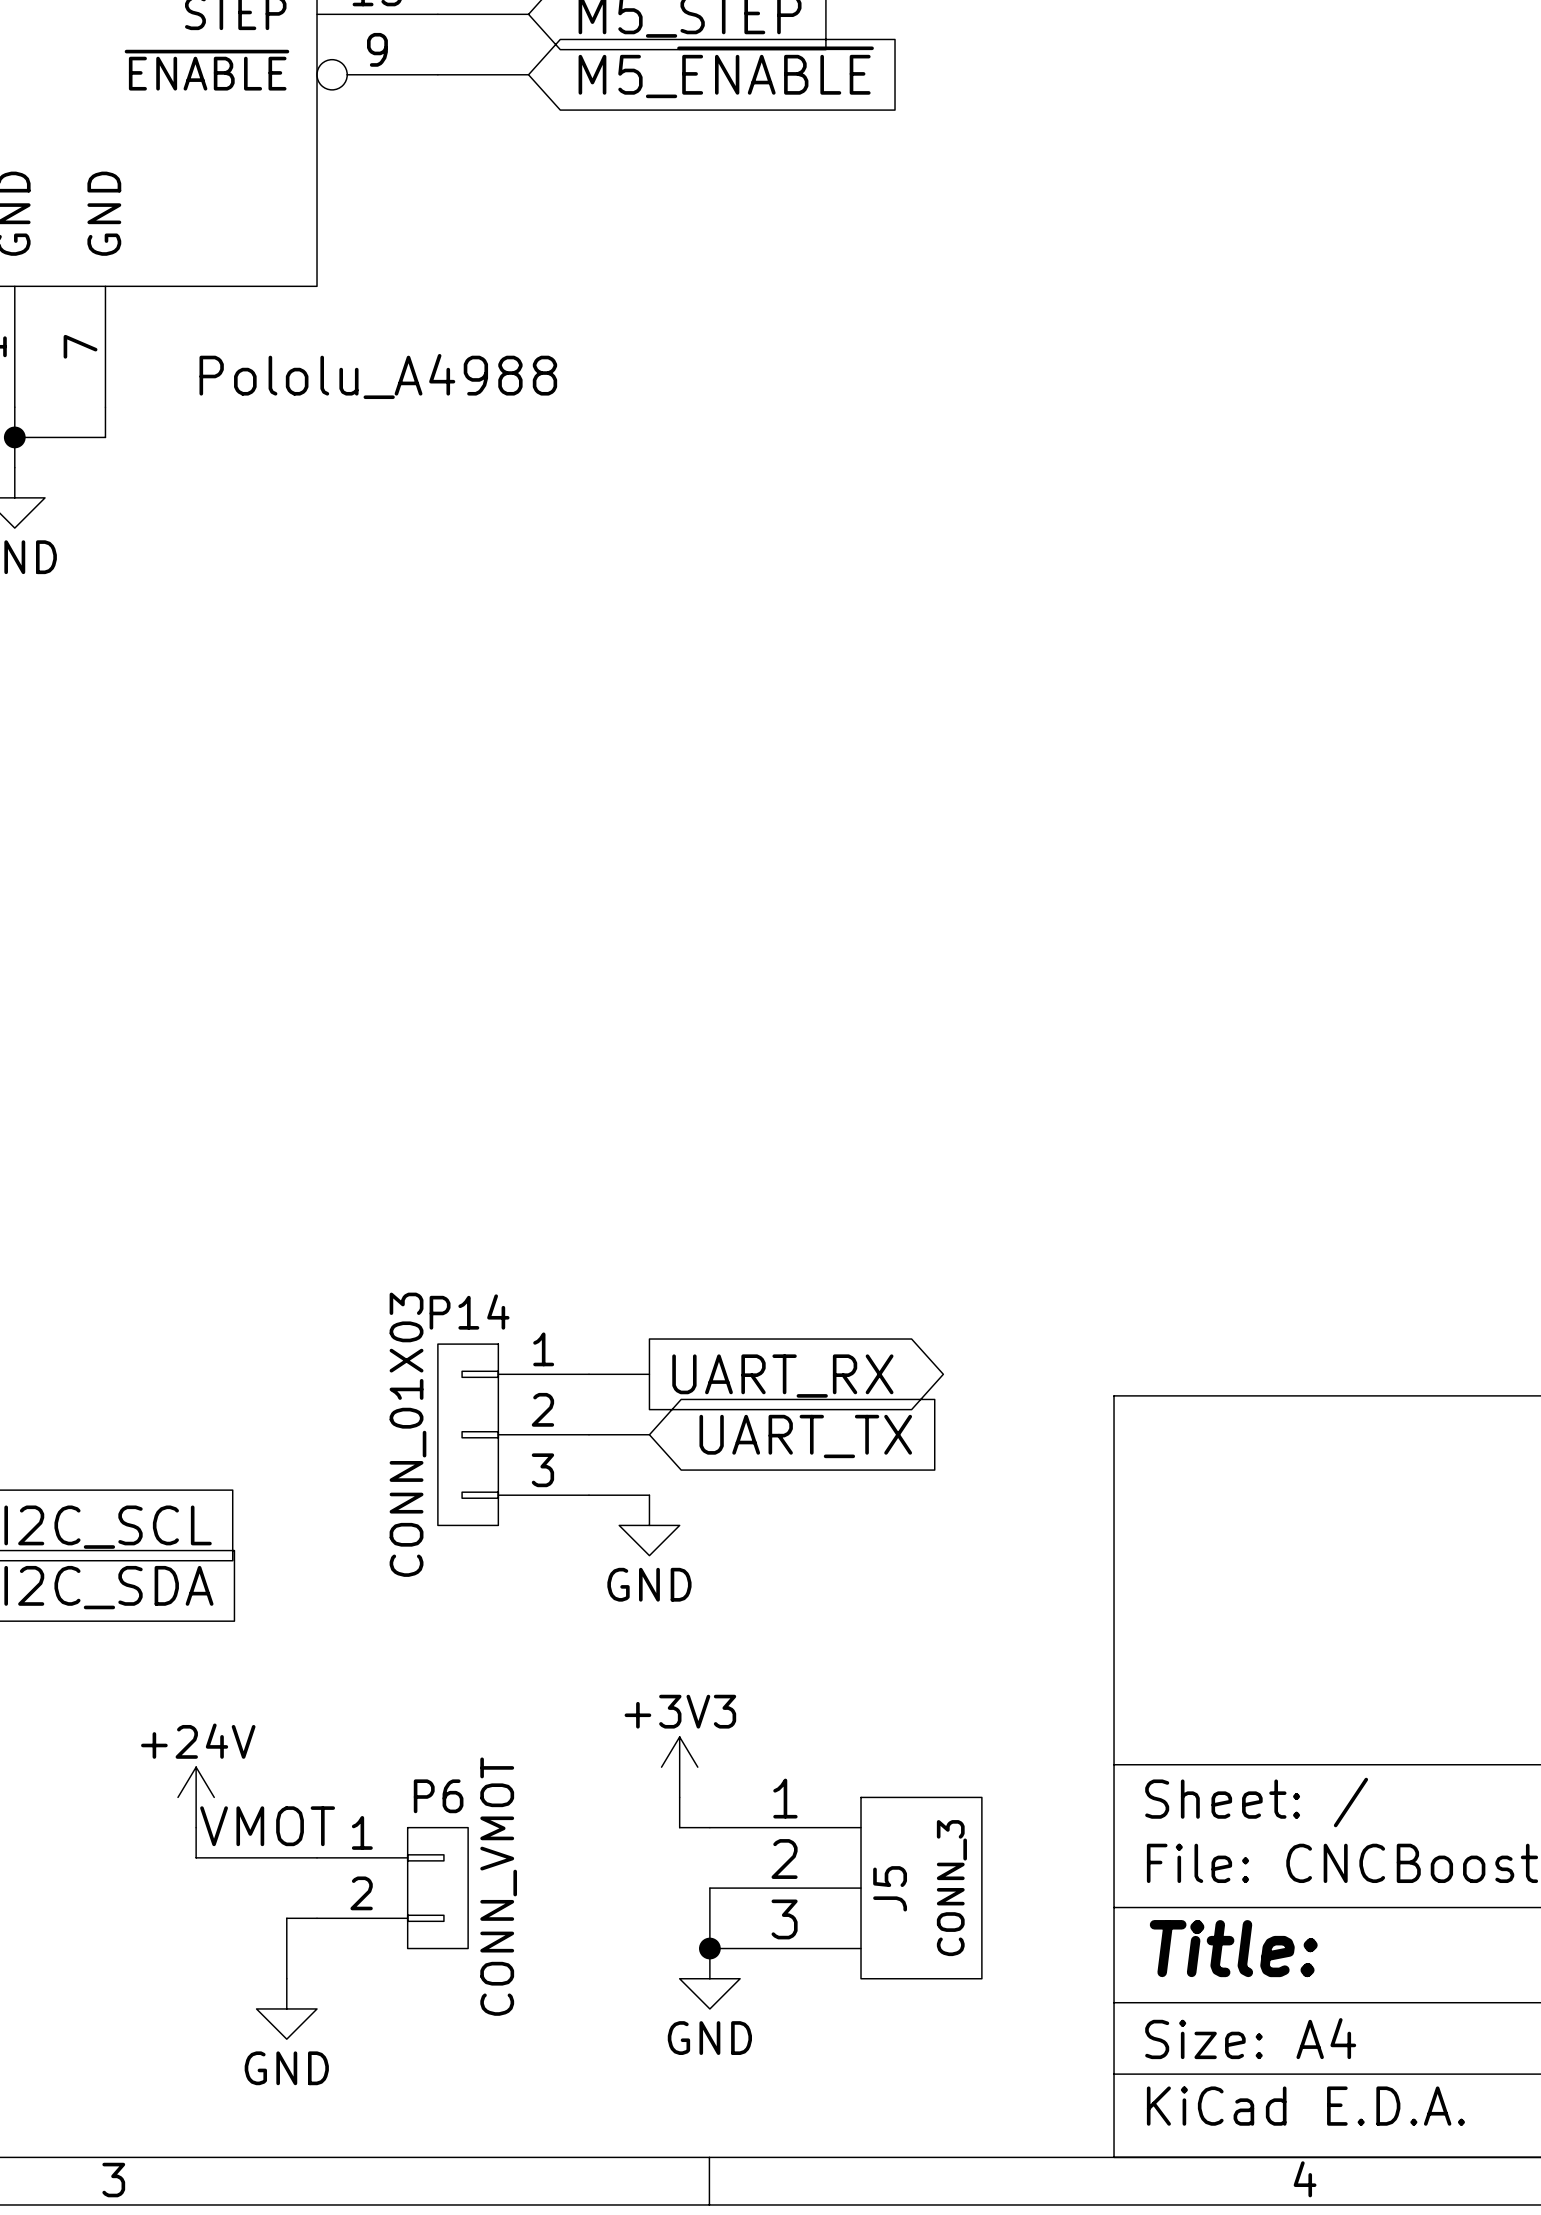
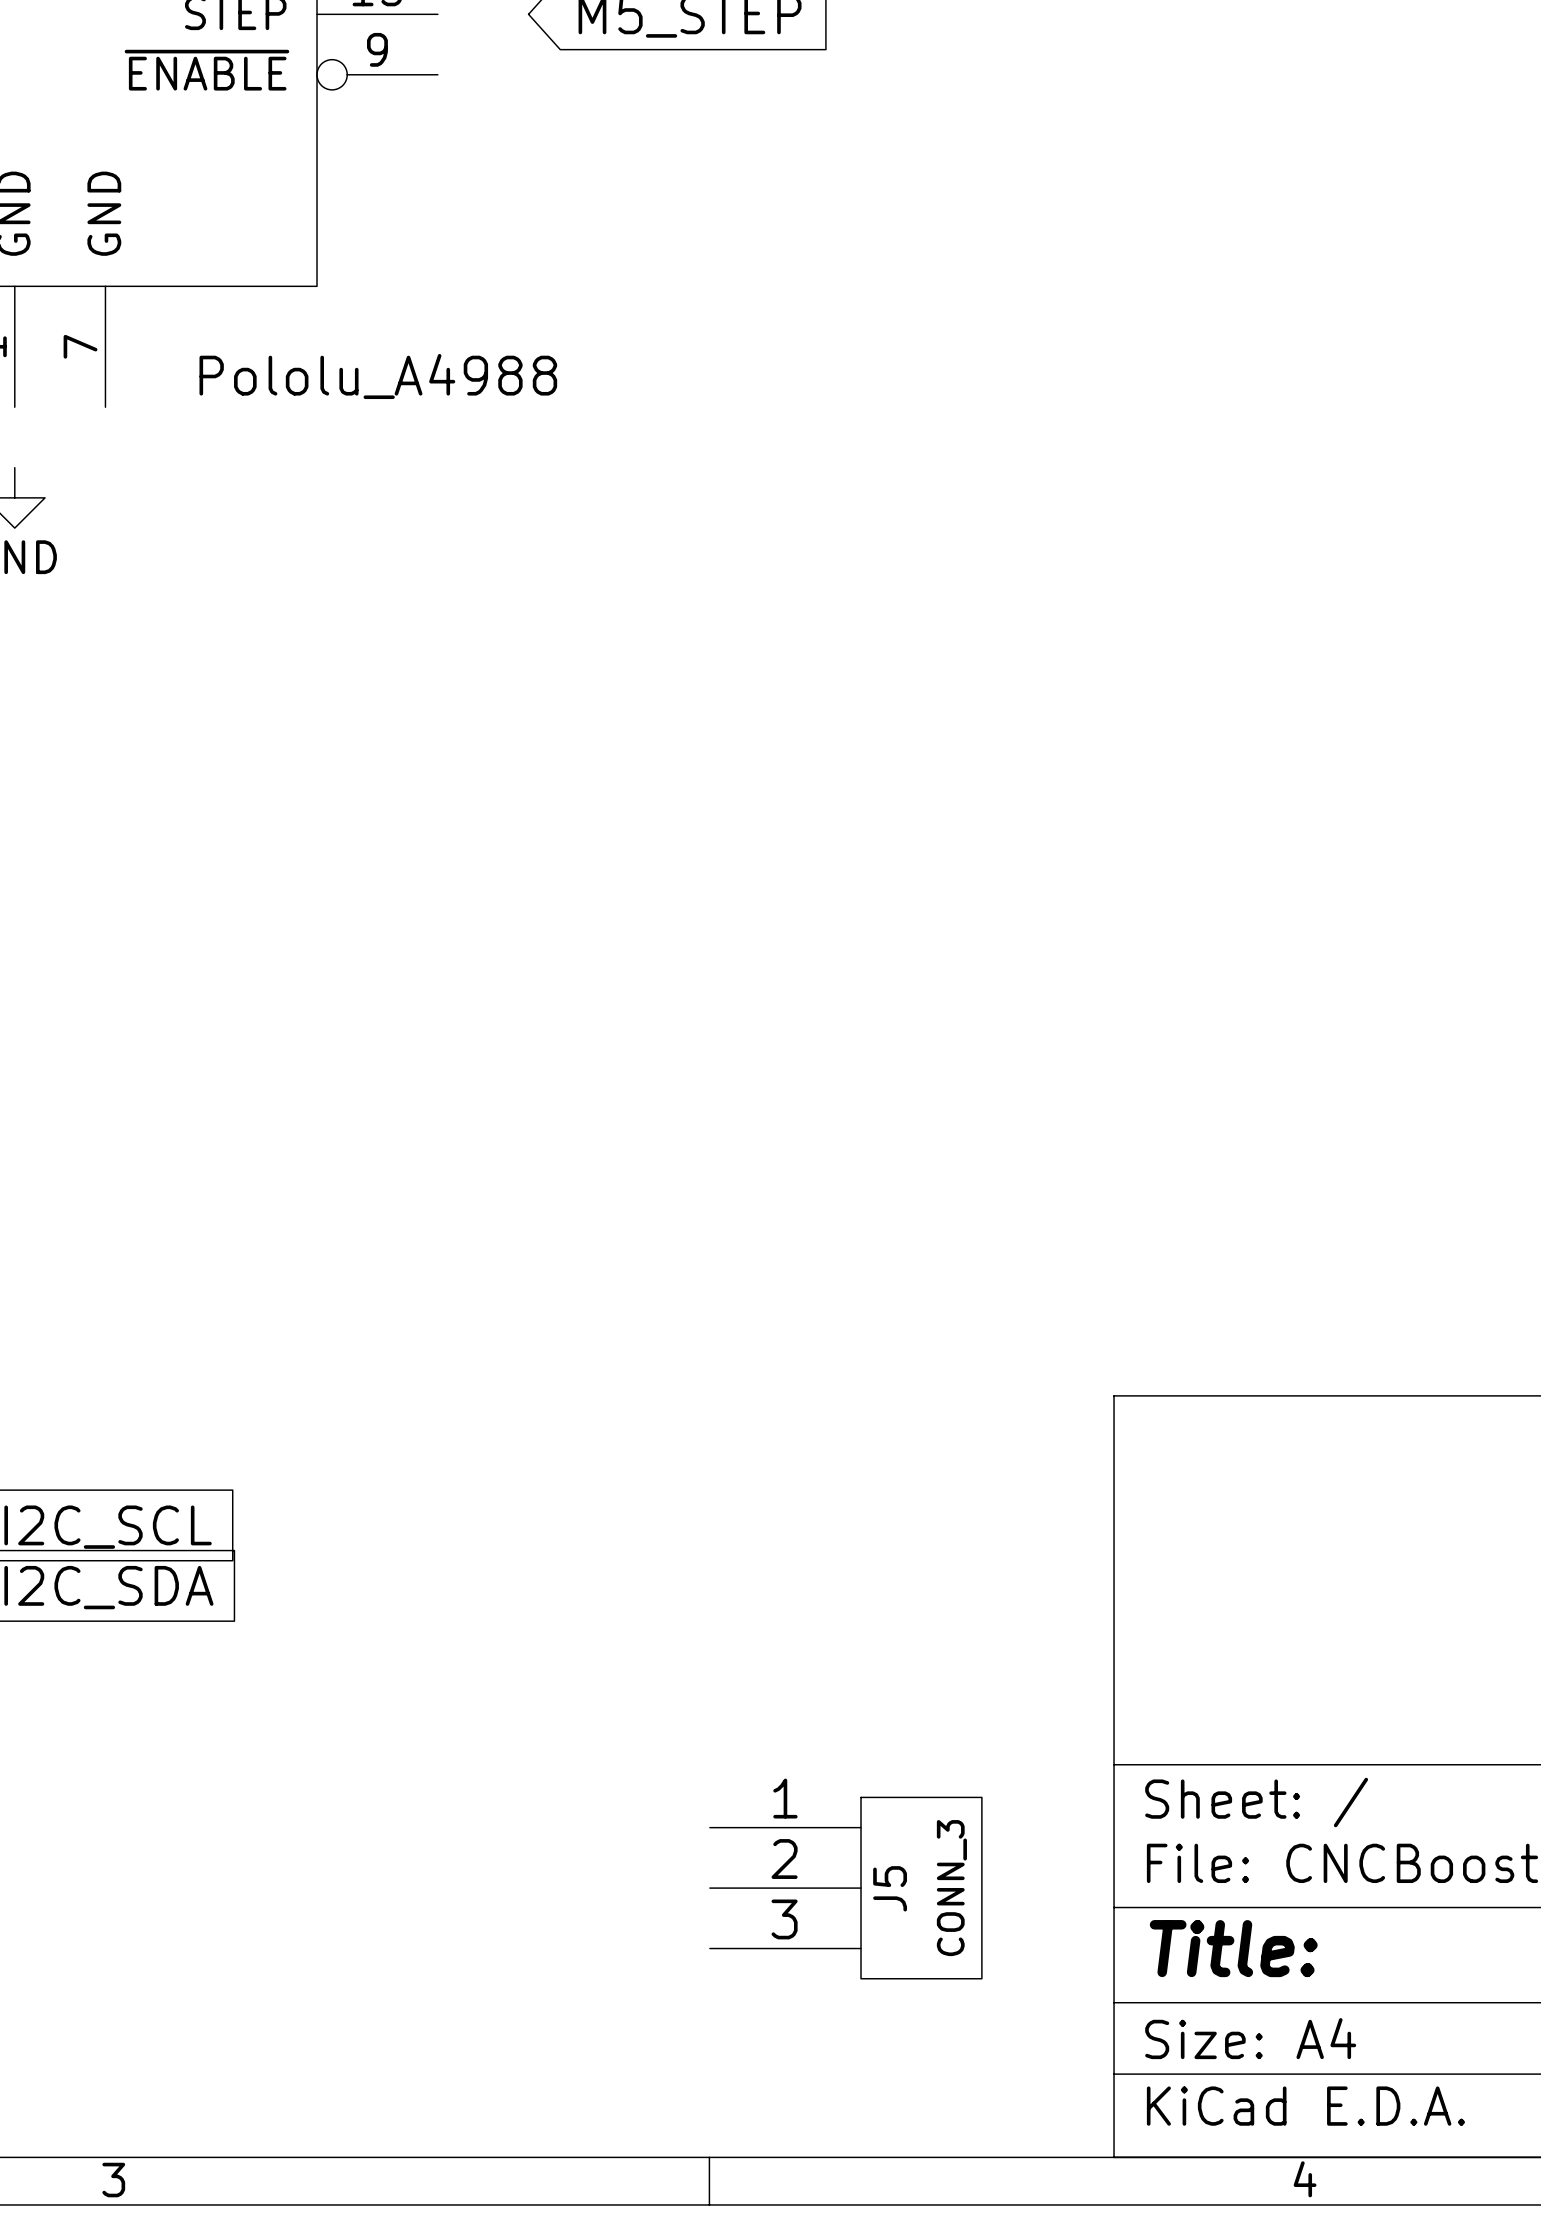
wire: (437, 14) (528, 14) -> none
global label: M5_~{ENABLE} (726, 72) -> none
wire: (437, 74) (528, 74) -> none
wire: (14, 407) (14, 467) -> none
wire: (105, 407) (105, 437) (14, 437) -> none
junction: (14, 437) -> none
wire: (589, 1374) (649, 1374) -> none
global label: UART_RX (782, 1376) -> none
P14: CONN_01X03 (513, 1434) -> none
wire: (589, 1434) (649, 1434) -> none
global label: UART_TX (805, 1436) -> none
wire: (589, 1495) (649, 1495) -> none
power symbol: GND (649, 1525) -> none
power symbol: +3V3 (679, 1767) -> none
power symbol: +24V (196, 1797) -> none
wire: (679, 1797) (679, 1827) (709, 1827) -> none
label: VMOT (267, 1826) -> none
wire: (196, 1827) (196, 1857) (317, 1857) -> none
P6: CONN_VMOT (392, 1888) -> none
wire: (709, 1888) (709, 1948) -> none
wire: (317, 1918) (286, 1918) (286, 1978) -> none
junction: (709, 1948) -> none
power symbol: GND (709, 1978) -> none
power symbol: GND (286, 2008) -> none

